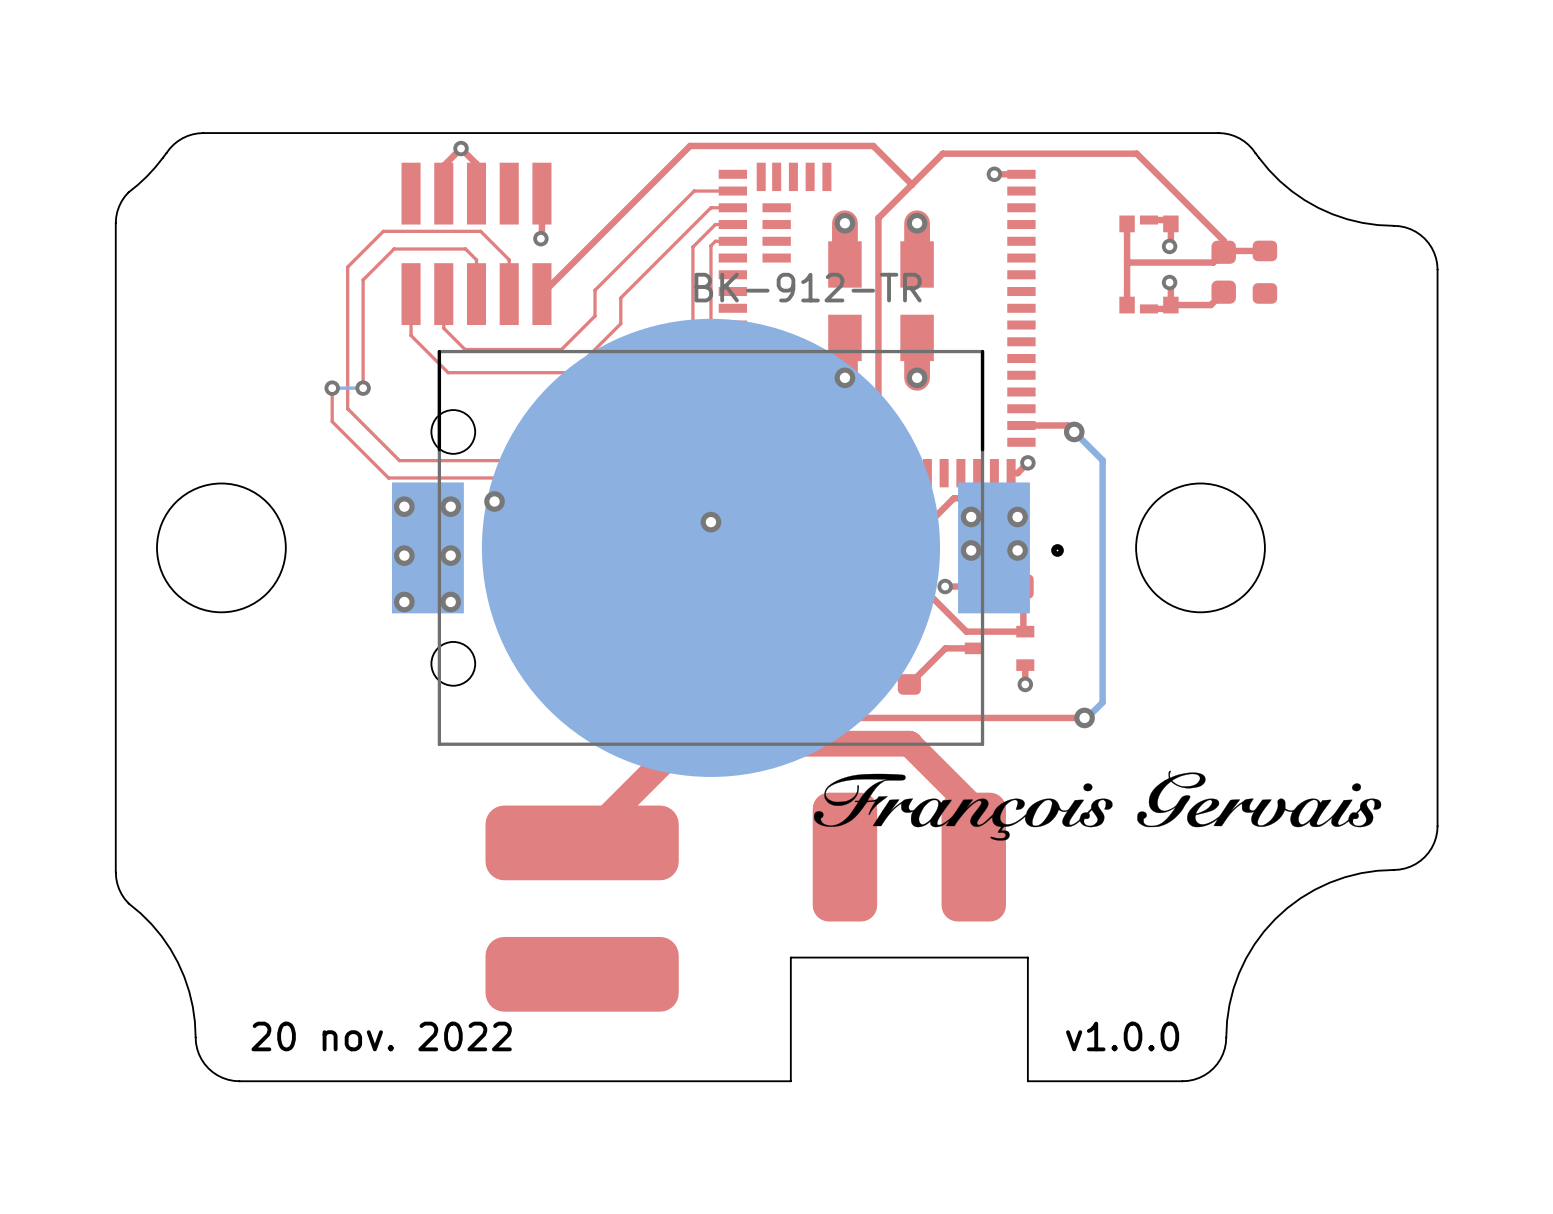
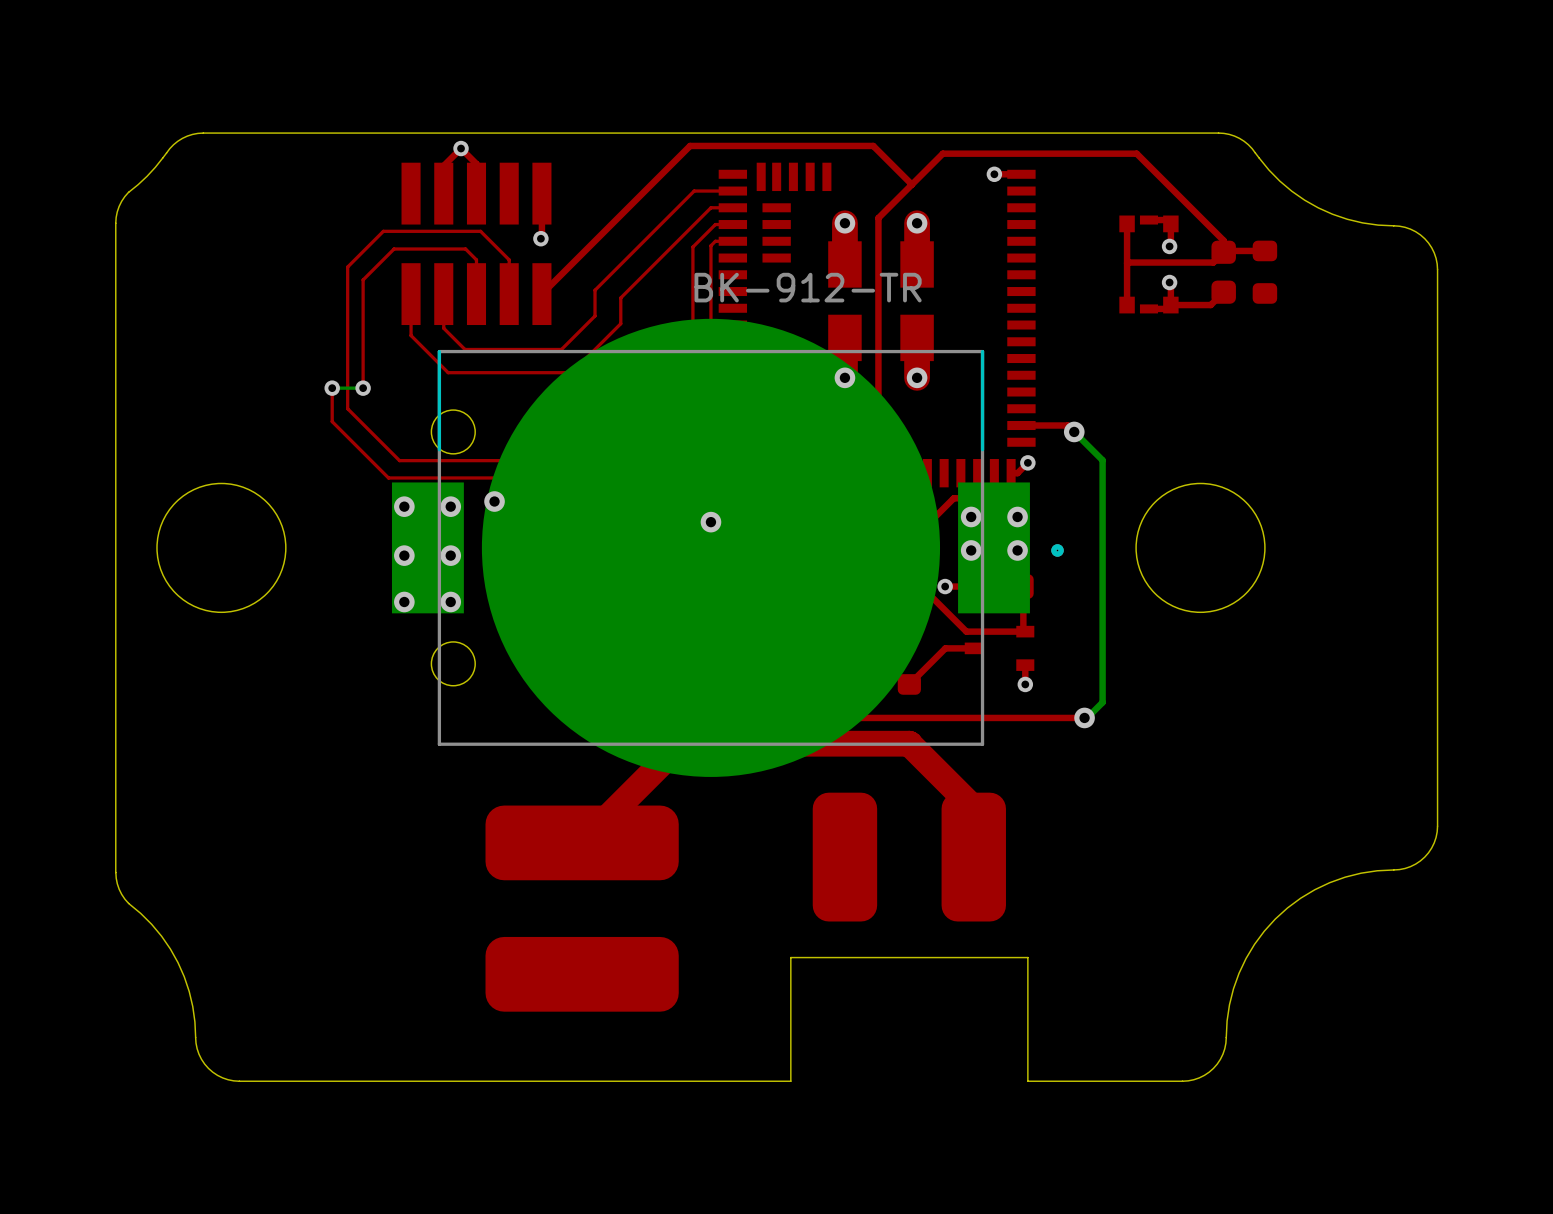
drawing: [814, 770, 1382, 841] -> none
text: 20 nov. 2022 (381, 1036) -> none
text: v1.0.0 (1122, 1036) -> none

